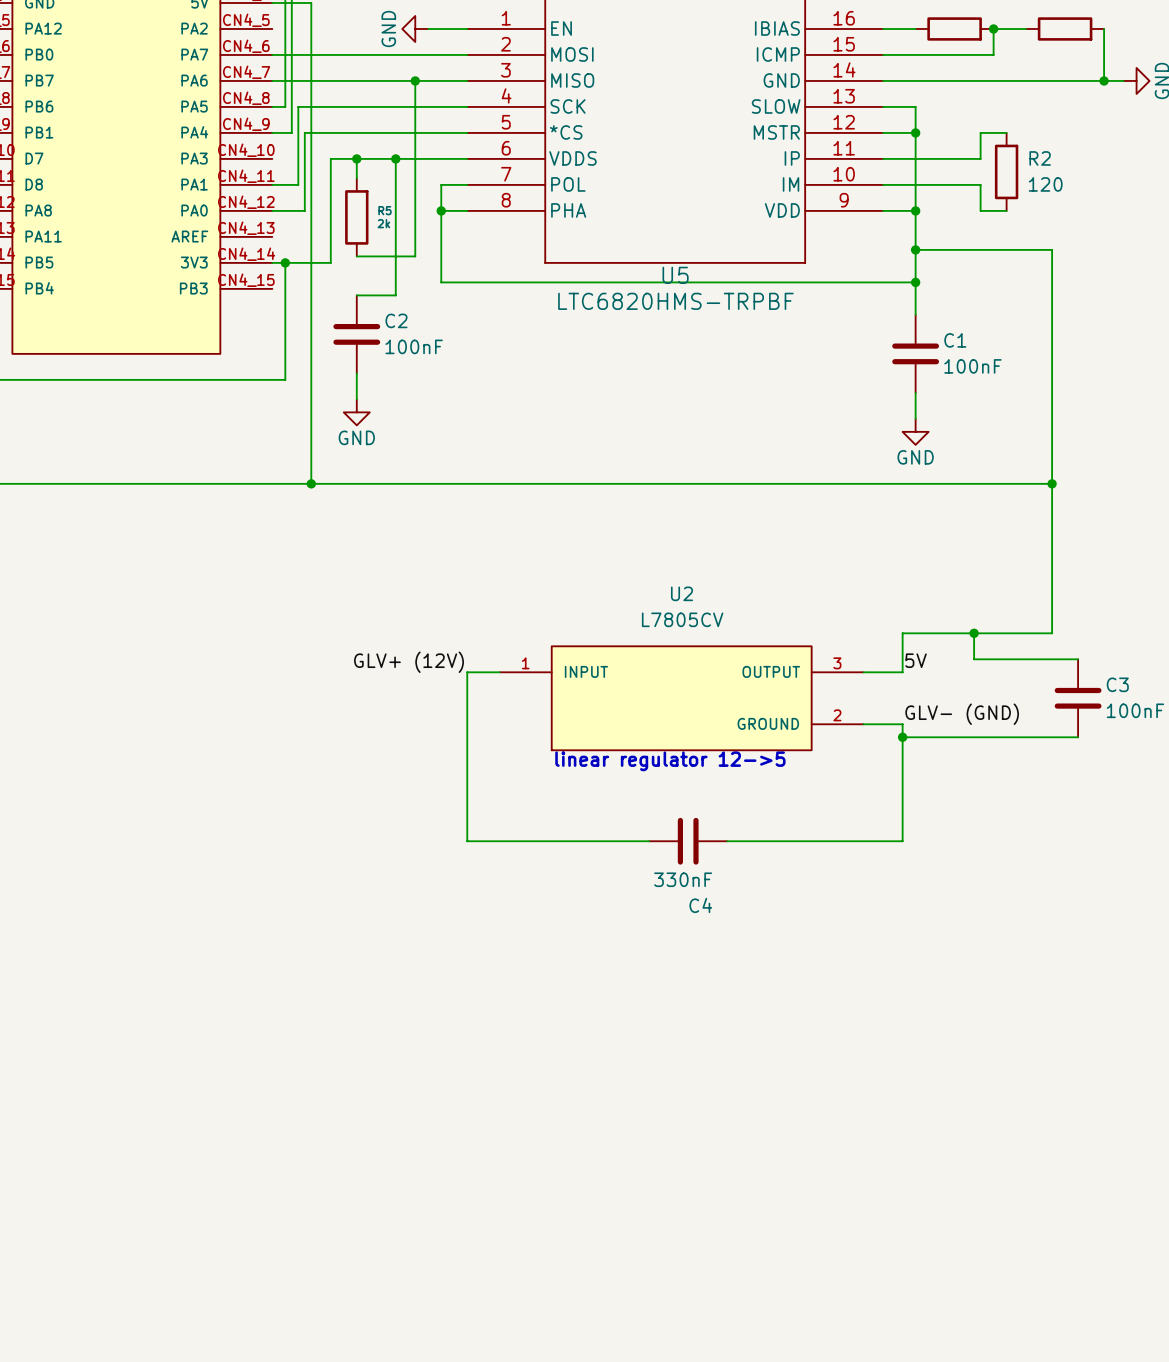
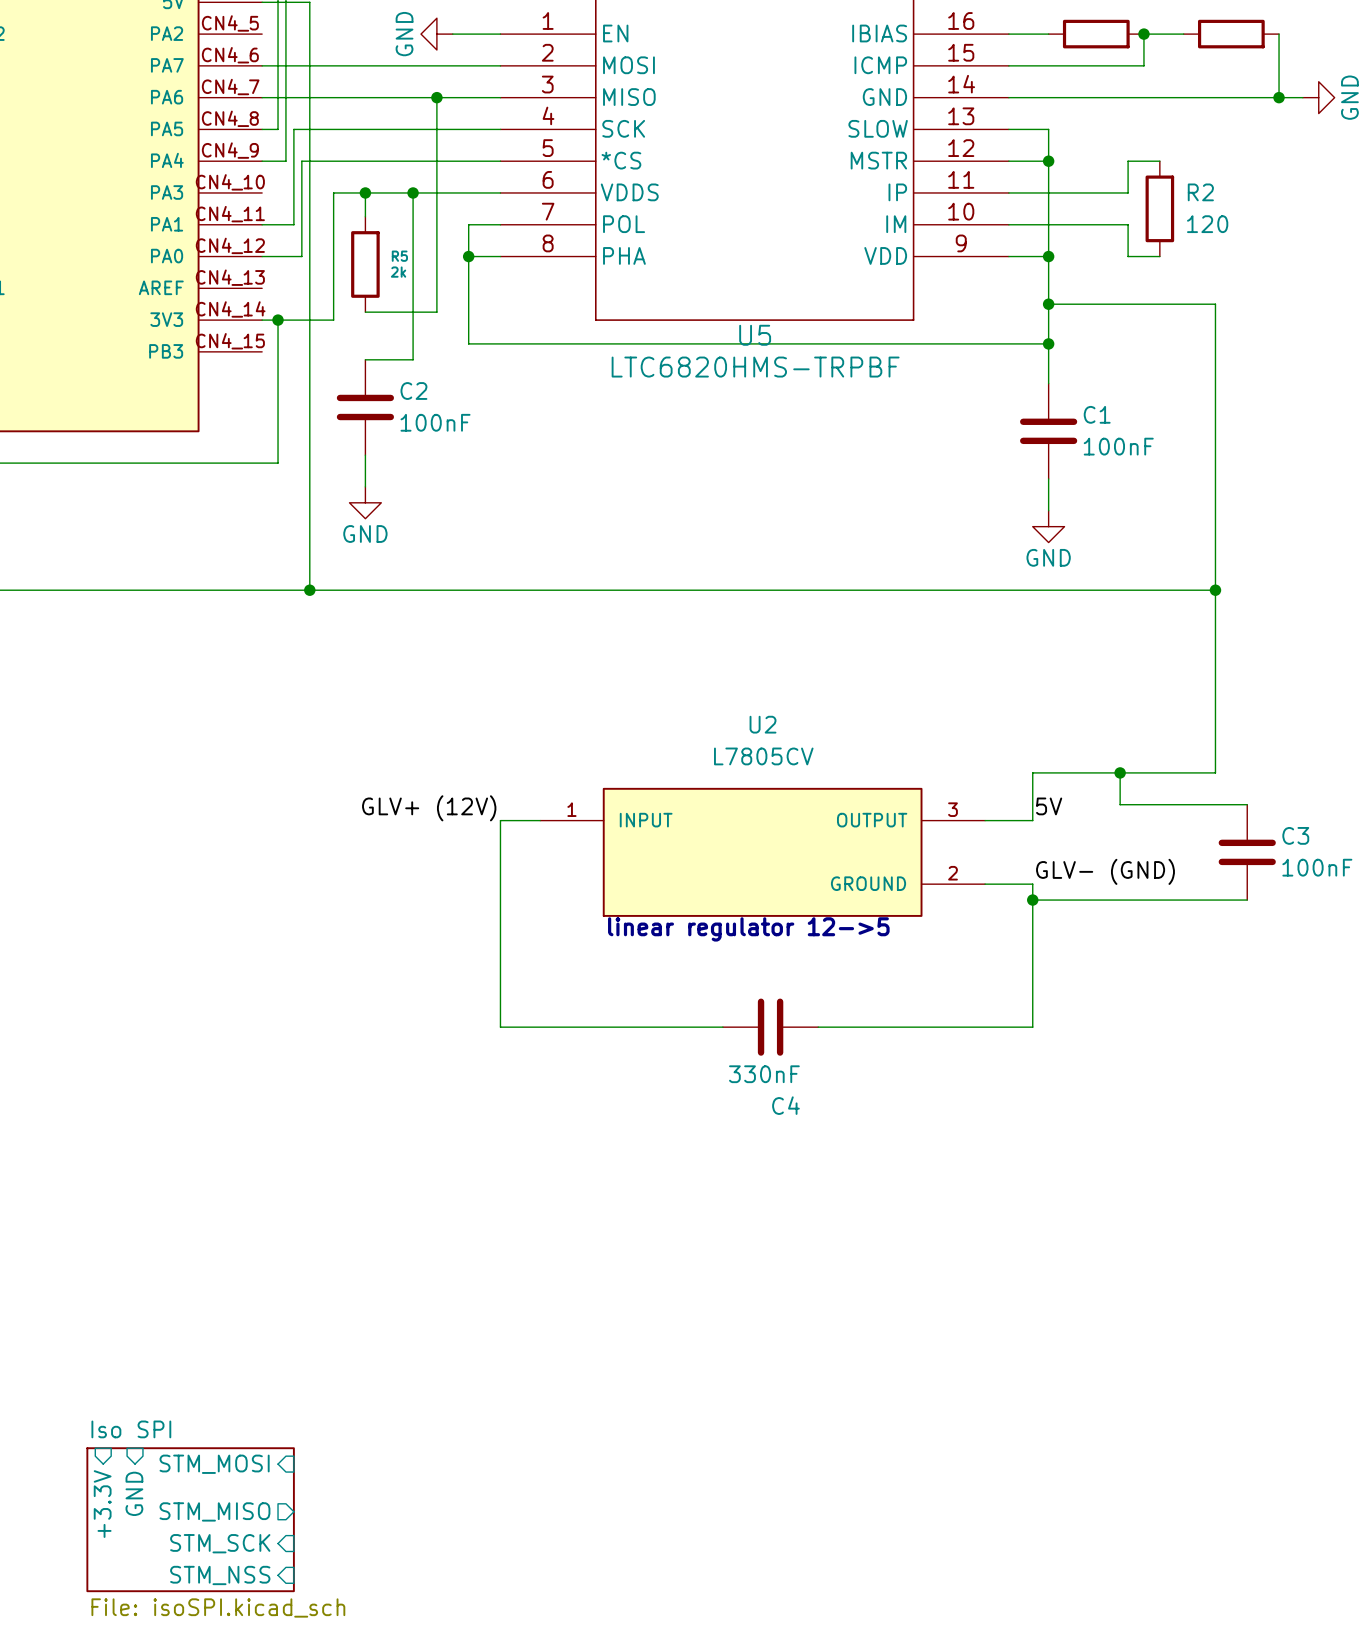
sheet pin: none -> STM_MOSI (214, 1464)
sheet pin: none -> GND (134, 1493)
sheet pin: none -> +3.3V (102, 1504)
sheet pin: none -> STM_MISO (214, 1511)
sheet Iso SPI: none -> File: isoSPI.kicad_sch (190, 1519)
sheet pin: none -> STM_SCK (220, 1543)
sheet pin: none -> STM_NSS (220, 1575)

